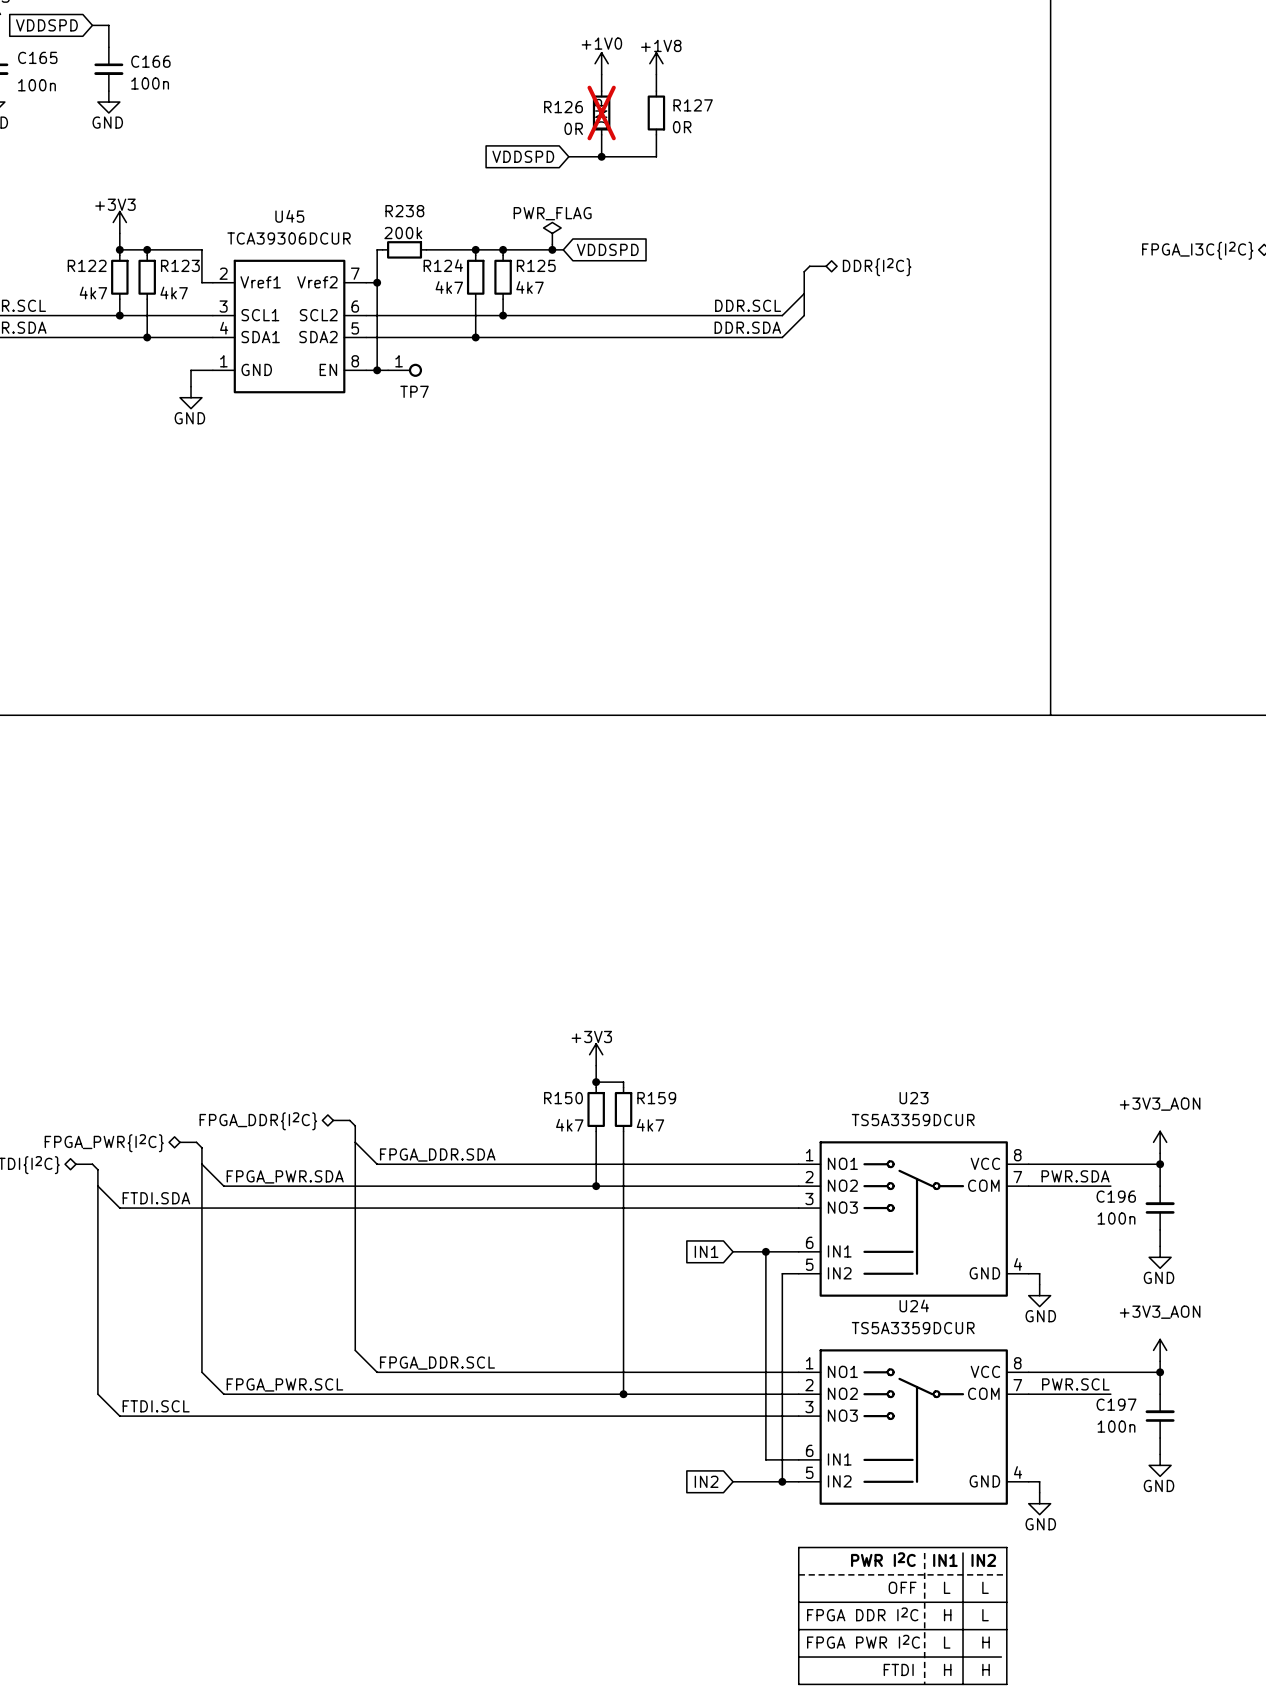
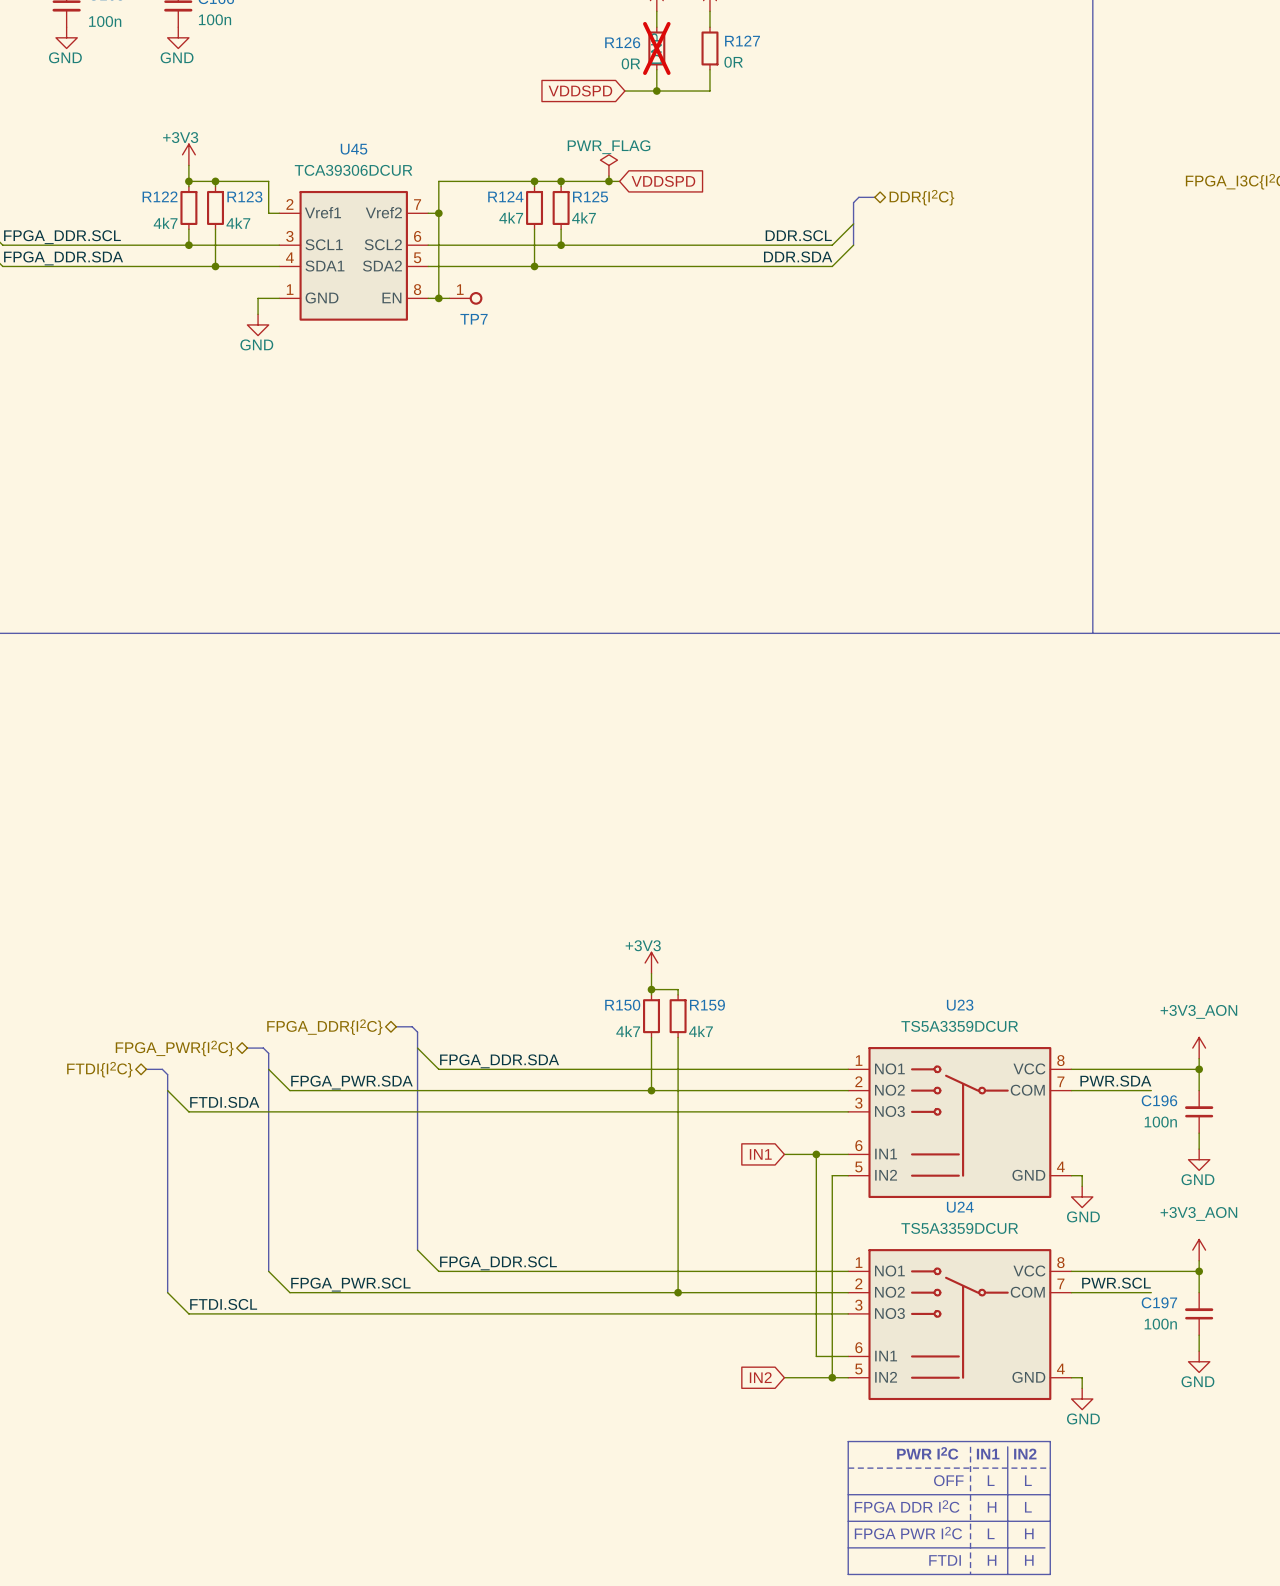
wire: none -> (444, 181) (486, 181)
R238: (404, 249) -> none

